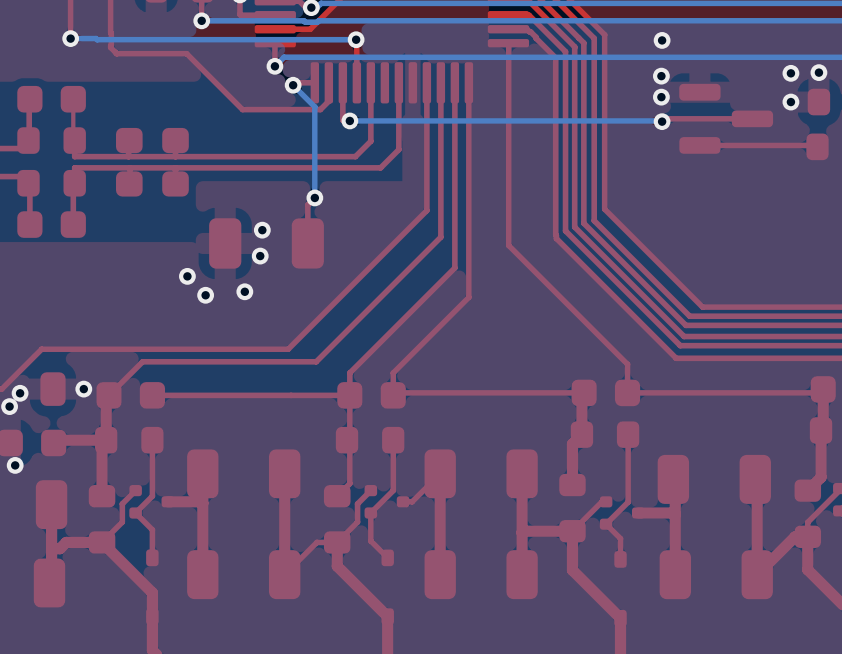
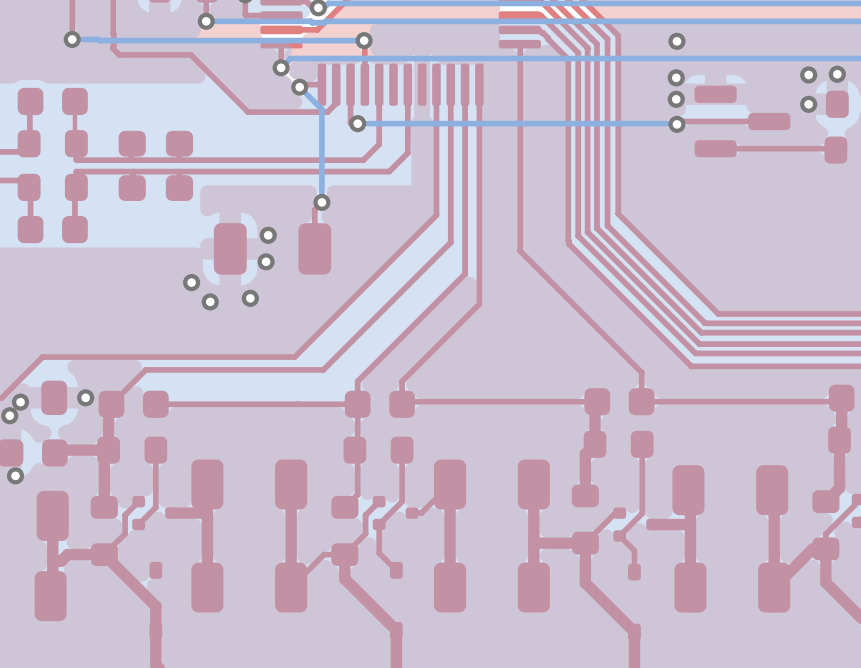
top track: (135, 513) (152, 529) (152, 557) -> none

